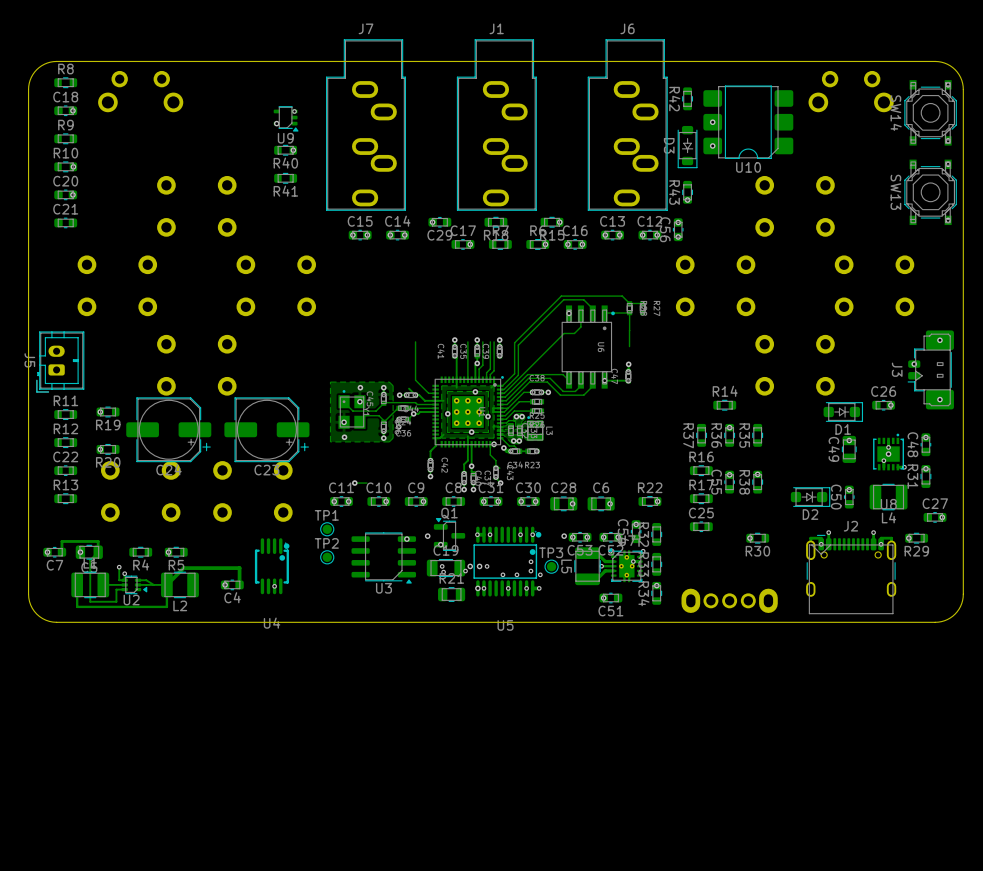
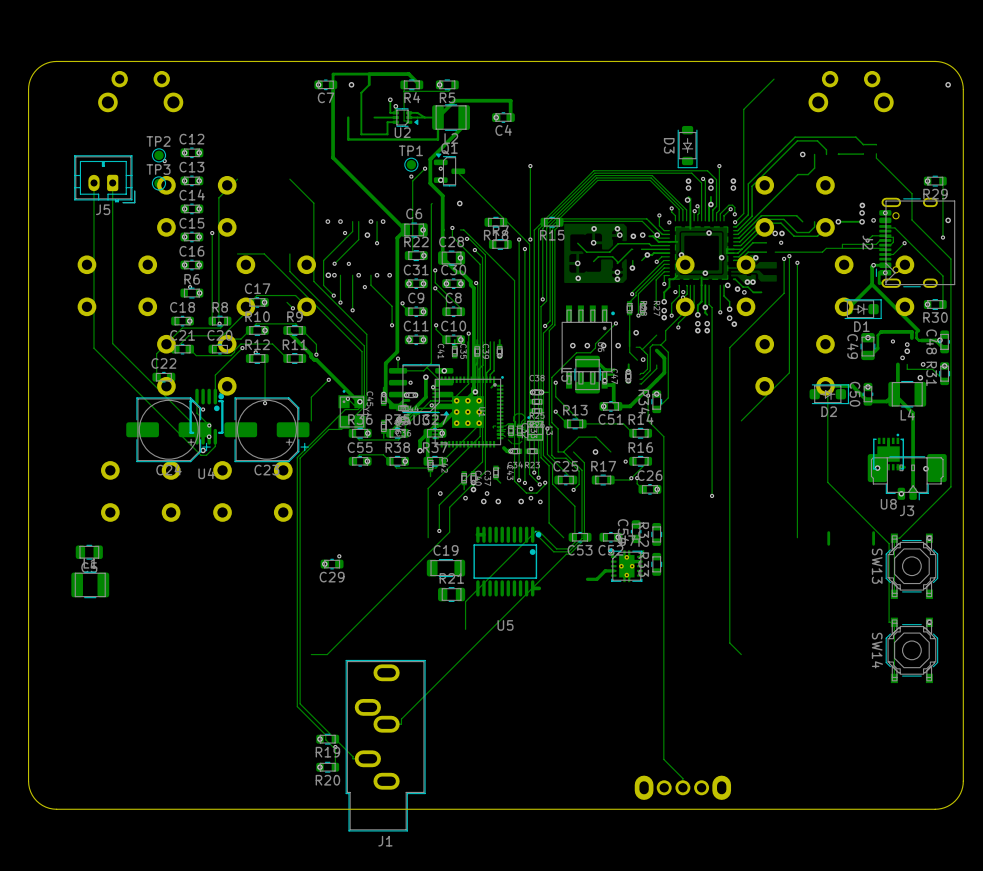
track: none -> (369, 74) (408, 74) (419, 84)
track: none -> (369, 74) (333, 74) (333, 157) (405, 229) (397, 237) (397, 351) (385, 363) (385, 398) (394, 406) (398, 406) (404, 400) (409, 400)
track: none -> (369, 74) (369, 84) (361, 92) (361, 134) (387, 134) (387, 122) (395, 122)
track: none -> (774, 79) (743, 109) (743, 213) (735, 222)
R8 position: (65, 82) -> (219, 321)
via: none -> (318, 84)
via: none -> (351, 84)
track: none -> (404, 84) (404, 120) (409, 122)
via: none -> (439, 84)
track: none -> (455, 84) (448, 91) (404, 91)
R42: (687, 98) -> none
track: none -> (390, 99) (390, 112) (395, 112) (395, 106)
via: none -> (390, 99)
via: none -> (395, 106)
C18 position: (65, 110) -> (182, 321)
via: (72, 110) -> none
via: (294, 111) -> none
SW14 position: (930, 112) -> (911, 650)
track: none -> (395, 117) (374, 117)
track: none -> (437, 117) (409, 117) (409, 112) (417, 112) (424, 117)
track: none -> (437, 117) (437, 139) (348, 139) (348, 117)
track: none -> (464, 117) (464, 125) (430, 159) (430, 183) (442, 195) (442, 257) (457, 272) (461, 272) (470, 281) (473, 288) (473, 387) (472, 393) (440, 425) (435, 425) (420, 440) (420, 450)
via: none -> (496, 117)
track: none -> (510, 117) (510, 100) (454, 100) (437, 117)
U9: (286, 118) -> none
via: (712, 122) -> none
U10: (748, 122) -> none
via: (276, 123) -> none
J7: (366, 125) -> none
J1 rotation: 0° (496, 125) -> 180° (385, 745)
J1 position: (496, 125) -> (385, 745)
J6: (627, 125) -> none
R9 position: (65, 138) -> (294, 330)
via: (948, 140) -> none
track: none -> (863, 144) (876, 144)
track: none -> (863, 144) (855, 137) (795, 137) (748, 183) (748, 214) (736, 226) (733, 226)
via: (712, 145) -> none
R40: (285, 150) -> none
via: (293, 150) -> none
via: none -> (184, 152)
via: none -> (199, 152)
track: none -> (863, 153) (838, 154)
track: none -> (876, 153) (876, 158) (912, 193) (912, 220) (950, 258) (950, 486) (899, 538) (894, 538) (894, 594)
via: none -> (802, 154)
track: none -> (814, 154) (814, 168) (808, 174) (797, 174) (738, 234) (733, 234)
track: none -> (826, 154) (826, 149) (817, 140) (797, 140) (752, 186) (752, 216) (737, 230) (733, 230)
via: none -> (164, 161)
via: (948, 164) -> none
R10 position: (65, 166) -> (257, 330)
via: (73, 166) -> none
track: none -> (530, 166) (530, 239)
via: none -> (530, 166)
track: none -> (719, 166) (719, 210) (716, 213) (716, 220)
via: none -> (719, 166)
track: none -> (425, 168) (412, 181) (412, 251) (408, 255)
via: none -> (425, 168)
via: none -> (440, 168)
track: none -> (458, 171) (529, 244) (529, 474) (539, 484)
via: none -> (411, 176)
R41: (285, 178) -> none
track: none -> (703, 178) (705, 181) (705, 220)
via: none -> (703, 178)
track: none -> (237, 179) (218, 197) (219, 323)
track: none -> (289, 179) (313, 203) (313, 281) (366, 334) (366, 404) (341, 429) (328, 429) (300, 458) (300, 703) (352, 758) (367, 758)
via: none -> (184, 180)
via: none -> (199, 180)
via: none -> (440, 180)
via: none -> (688, 181)
via: none -> (710, 181)
via: none -> (733, 181)
via: none -> (927, 181)
track: none -> (942, 181) (942, 237)
track: none -> (93, 182) (93, 348) (201, 455) (206, 455) (215, 446) (215, 436)
track: none -> (112, 182) (112, 343) (197, 427) (197, 436)
via: none -> (688, 188)
via: none -> (710, 188)
via: none -> (733, 188)
R43: (687, 192) -> none
SW13 position: (930, 192) -> (911, 566)
C20 position: (65, 194) -> (219, 349)
via: (72, 194) -> none
track: none -> (688, 197) (690, 198) (690, 228)
track: none -> (710, 197) (709, 220)
track: none -> (432, 203) (431, 363) (423, 370) (398, 370) (398, 358)
via: none -> (459, 203)
via: none -> (710, 204)
via: none -> (862, 205)
track: none -> (697, 206) (699, 207) (697, 220)
via: none -> (697, 206)
via: none -> (184, 208)
via: none -> (199, 208)
track: none -> (671, 208) (675, 220)
via: none -> (671, 208)
track: none -> (730, 209) (724, 215)
via: none -> (730, 209)
track: none -> (694, 211) (694, 220)
via: none -> (694, 211)
via: none -> (862, 212)
via: none -> (885, 212)
track: none -> (734, 214) (734, 207) (728, 205) (720, 213) (720, 220)
via: none -> (734, 214)
track: none -> (659, 215) (659, 225) (664, 230) (669, 230)
via: none -> (659, 215)
track: none -> (724, 215) (724, 220)
track: none -> (679, 220) (679, 209) (650, 180) (597, 180) (550, 227) (550, 321) (545, 325)
track: none -> (682, 220) (682, 209) (651, 177) (596, 177) (546, 228) (546, 301) (541, 306) (541, 457) (549, 465) (549, 523) (563, 537)
track: none -> (686, 220) (686, 210) (652, 175) (595, 175) (542, 228) (542, 299)
track: none -> (701, 220) (701, 182) (691, 173) (594, 173) (538, 229) (538, 477)
track: none -> (712, 220) (712, 210) (716, 206) (716, 179) (707, 170) (593, 170) (534, 230) (534, 472)
via: none -> (873, 220)
via: none -> (327, 221)
via: none -> (340, 221)
track: none -> (352, 221) (352, 231) (323, 260) (323, 285) (333, 295)
track: none -> (358, 221) (358, 239) (334, 263)
via: none -> (370, 221)
track: none -> (377, 221) (377, 243)
via: none -> (383, 221)
track: none -> (802, 221) (796, 215) (761, 215) (738, 238) (733, 238)
track: none -> (814, 221) (814, 227) (809, 232) (796, 232) (783, 219) (762, 219) (739, 241) (733, 241)
track: none -> (826, 221) (826, 227) (817, 236) (794, 236) (781, 223) (763, 223) (740, 245) (733, 245)
track: none -> (838, 221) (862, 221)
via: none -> (838, 221)
via: none -> (862, 221)
C21 position: (65, 222) -> (182, 349)
via: (432, 222) -> none
C29 position: (439, 222) -> (332, 564)
via: (559, 222) -> none
via: none -> (669, 222)
via: (678, 222) -> none
via: none -> (735, 222)
zone outline: none -> (727, 226) (675, 226) (675, 279) (727, 279) (727, 226)
track: none -> (885, 226) (894, 227) (942, 276) (942, 304)
track: none -> (452, 227) (452, 236) (480, 264) (480, 436) (428, 488) (428, 537)
via: none -> (452, 227)
via: none -> (594, 228)
via: none -> (617, 228)
via: none -> (423, 229)
track: none -> (460, 229) (463, 229) (514, 280) (514, 481) (526, 493) (536, 493) (545, 482)
C56: (678, 229) -> none
via: none -> (709, 232)
track: none -> (212, 233) (212, 321)
via: none -> (212, 233)
via: none -> (345, 233)
track: none -> (766, 233) (757, 233) (738, 253) (726, 253) (726, 249) (733, 249) (741, 249)
via: none -> (775, 233)
via: none -> (781, 233)
track: none -> (669, 234) (662, 234) (646, 218) (562, 218) (552, 228) (552, 324) (543, 333) (543, 455) (552, 464) (552, 483) (574, 506) (574, 542) (568, 548) (556, 548) (539, 531) (535, 531) (465, 601) (465, 629)
via: (352, 235) -> none
C15 position: (360, 235) -> (191, 236)
via: (390, 235) -> none
C14 position: (397, 235) -> (191, 208)
via: (404, 235) -> none
via: (605, 235) -> none
C13 position: (612, 235) -> (191, 180)
C12 position: (649, 235) -> (191, 152)
via: none -> (184, 236)
via: none -> (199, 236)
via: none -> (633, 236)
track: none -> (649, 236) (652, 236) (658, 241) (677, 241)
via: (678, 236) -> none
via: none -> (942, 237)
track: none -> (466, 238) (469, 238) (485, 254) (485, 471) (449, 507) (449, 532) (327, 654) (311, 654)
via: none -> (466, 238)
track: none -> (669, 238) (659, 238) (642, 221) (563, 221) (554, 229) (554, 325) (549, 330) (549, 424) (551, 427) (551, 455) (554, 458) (566, 458) (579, 471) (579, 484) (573, 489)
track: none -> (519, 239) (519, 480)
via: none -> (519, 239)
via: none -> (530, 239)
track: none -> (867, 240) (872, 235) (893, 237) (893, 242) (890, 245) (885, 245)
via: none -> (867, 240)
track: none -> (885, 240) (880, 240) (876, 244) (842, 244) (842, 248)
via: none -> (593, 242)
track: none -> (766, 242) (753, 242) (738, 256) (733, 256)
via: none -> (781, 242)
via: none -> (377, 243)
track: none -> (577, 243) (586, 252) (609, 252) (618, 243) (669, 245)
track: none -> (904, 243) (893, 254) (885, 254)
via: none -> (904, 243)
C17 position: (462, 244) -> (257, 302)
via position: (470, 244) -> (460, 257)
R6 position: (537, 244) -> (191, 293)
via: (545, 244) -> none
via: (567, 244) -> none
C16 position: (575, 244) -> (191, 265)
via: (582, 244) -> none
track: none -> (524, 249) (524, 482)
via: none -> (524, 249)
track: none -> (632, 249) (617, 263) (612, 256) (598, 256) (593, 261)
track: none -> (669, 249) (641, 249)
track: none -> (885, 249) (826, 248) (822, 252) (775, 252)
track: none -> (474, 250) (482, 257) (482, 461) (439, 505) (439, 530)
via: none -> (474, 250)
track: none -> (766, 252) (748, 252) (739, 260) (733, 260)
track: none -> (237, 253) (264, 253) (362, 351) (362, 402) (359, 405) (354, 405) (347, 398)
track: none -> (289, 253) (289, 271) (364, 346) (364, 403) (358, 409) (345, 409) (297, 457) (297, 706) (325, 735) (325, 739) (335, 747) (335, 767)
track: none -> (669, 253) (653, 253) (647, 254) (641, 260)
via: none -> (647, 254)
via: none -> (681, 254)
via: none -> (423, 255)
track: none -> (669, 256) (661, 256) (656, 261)
track: none -> (789, 256) (789, 372) (741, 420)
via: none -> (789, 256)
via: none -> (721, 257)
via: none -> (755, 257)
track: none -> (784, 258) (784, 293) (729, 347) (729, 643) (741, 654)
via: none -> (784, 258)
track: none -> (632, 260) (632, 268)
track: none -> (669, 260) (663, 260) (632, 294)
via: none -> (656, 261)
track: none -> (797, 262) (797, 537)
via: none -> (797, 262)
via: none -> (334, 263)
via: none -> (348, 263)
via: none -> (577, 263)
track: none -> (669, 264) (664, 264) (636, 292) (636, 295) (629, 302) (629, 352) (637, 360)
via: none -> (184, 265)
via: none -> (199, 265)
via: none -> (873, 265)
track: none -> (885, 265) (872, 266) (872, 284)
via: none -> (632, 268)
track: none -> (669, 268) (664, 268) (638, 293) (638, 315)
track: none -> (435, 270) (435, 282) (460, 308) (460, 311)
via: none -> (435, 270)
track: none -> (669, 271) (664, 271) (656, 279) (656, 306)
via: none -> (617, 272)
track: none -> (885, 272) (879, 272) (879, 283) (891, 283)
via: none -> (885, 272)
via: none -> (705, 273)
via: none -> (328, 275)
via: none -> (334, 275)
track: none -> (340, 275) (340, 302)
track: none -> (352, 275) (352, 310)
via: none -> (358, 275)
track: none -> (370, 275) (370, 285) (392, 306) (392, 325)
via: none -> (377, 275)
via: none -> (389, 275)
track: none -> (669, 275) (664, 275) (664, 284)
track: none -> (677, 275) (673, 279) (669, 279) (669, 287) (664, 292) (664, 301)
track: none -> (701, 277) (701, 301) (697, 305) (697, 314)
via: none -> (578, 278)
via: none -> (617, 279)
track: none -> (733, 279) (753, 292) (761, 292)
via: none -> (747, 282)
via: none -> (753, 282)
via: none -> (409, 283)
via: none -> (423, 283)
via: none -> (446, 283)
via: none -> (460, 283)
track: none -> (476, 283) (477, 284) (477, 426) (435, 468) (396, 468) (383, 454) (359, 454) (352, 461)
via: none -> (476, 283)
via: none -> (664, 284)
track: none -> (872, 284) (847, 309)
track: none -> (872, 284) (918, 330) (916, 338) (918, 340) (935, 340) (944, 349)
track: none -> (679, 285) (679, 295) (671, 303) (671, 315)
track: none -> (686, 285) (687, 293) (683, 297)
track: none -> (690, 285) (690, 306) (665, 330) (665, 340) (660, 344)
track: none -> (694, 285) (694, 307) (678, 323) (678, 327)
track: none -> (705, 285) (705, 312) (707, 314)
track: none -> (709, 285) (709, 304) (712, 307) (712, 495)
track: none -> (720, 285) (720, 312)
track: none -> (724, 285) (724, 296) (729, 301) (729, 309)
via: none -> (727, 285)
via: none -> (190, 287)
via: none -> (364, 287)
track: none -> (435, 288) (446, 299) (446, 311)
via: none -> (435, 288)
via: none -> (737, 289)
via: none -> (675, 292)
via: none -> (683, 292)
via: none -> (744, 292)
via: none -> (199, 293)
via: none -> (632, 294)
via: none -> (333, 295)
via: none -> (683, 297)
via: none -> (542, 299)
via: none -> (664, 301)
via: none -> (264, 302)
track: none -> (287, 302) (292, 308)
track: none -> (302, 302) (295, 295) (256, 295) (250, 302) (250, 308) (222, 335) (188, 335) (175, 349)
via: none -> (340, 302)
track: none -> (402, 303) (409, 311)
via: none -> (402, 303)
track: (642, 303) (629, 303) (622, 296) (561, 296) (514, 342) (514, 373) (502, 385) (500, 385) -> none
via: none -> (927, 304)
via: none -> (705, 307)
via: none -> (292, 308)
track: (604, 308) (604, 313) (629, 313) (629, 330) -> none
via: none -> (729, 309)
via: none -> (352, 310)
via: none -> (664, 310)
via: none -> (423, 311)
via: none -> (720, 312)
via: (569, 313) -> none
track: (580, 313) (580, 327) (574, 333) (564, 333) (504, 393) (500, 393) -> none
track: (592, 313) (592, 308) (583, 299) (563, 299) (518, 345) (518, 375) (504, 389) (500, 389) -> none
via: none -> (697, 314)
via: none -> (638, 315)
via: none -> (671, 315)
via: none -> (664, 317)
via: none -> (729, 318)
via: none -> (189, 321)
track: none -> (227, 321) (220, 328) (182, 328) (156, 353) (156, 377)
via: none -> (219, 323)
track: none -> (615, 323) (595, 343) (595, 347) (590, 352) (576, 352) (551, 377) (551, 422) (558, 428) (558, 451) (563, 451)
via: none -> (615, 323)
via: none -> (697, 323)
via: none -> (707, 323)
via: none -> (734, 324)
via: none -> (392, 325)
track: none -> (436, 325) (436, 329) (446, 339)
via: none -> (436, 325)
via: none -> (545, 325)
via: none -> (678, 327)
via: none -> (265, 330)
track: none -> (287, 330) (357, 400)
via: none -> (697, 330)
via: none -> (707, 330)
via: none -> (636, 332)
track: none -> (468, 333) (468, 383) (451, 400) (430, 400) (405, 426) (405, 433) (398, 439) (359, 439) (352, 433)
via: none -> (468, 333)
track: none -> (656, 335) (642, 349)
via: none -> (867, 337)
track: none -> (911, 338) (911, 331) (881, 331) (877, 335) (877, 348) (870, 355) (867, 355)
via: none -> (409, 339)
via: none -> (423, 339)
via: none -> (460, 339)
via: (454, 340) -> none
via: (477, 340) -> none
via: (499, 340) -> none
track: (415, 341) (415, 380) (428, 393) (435, 393) -> none
via: none -> (892, 341)
track: none -> (660, 344) (668, 352) (668, 397) (656, 409)
track: none -> (660, 344) (652, 344) (650, 347) (650, 370) (639, 379)
via: none -> (907, 344)
via: none -> (572, 345)
via: none -> (587, 345)
via: none -> (603, 345)
via: none -> (618, 345)
via: (454, 346) -> none
via: (477, 346) -> none
via: (499, 346) -> none
track: none -> (636, 347) (640, 347) (647, 354) (647, 369) (639, 374)
track: none -> (242, 348) (215, 375) (215, 396)
via: none -> (242, 348)
track: none -> (189, 349) (196, 355) (231, 355) (240, 344) (272, 344) (287, 358)
track: none -> (212, 349) (222, 339) (241, 339) (256, 323) (295, 323) (316, 344) (316, 354)
track: none -> (656, 350) (664, 358) (664, 372) (630, 406) (618, 406) (613, 401) (613, 383) (607, 385)
via: none -> (907, 351)
via: none -> (255, 352)
via: none -> (316, 354)
track: (454, 355) (456, 357) (456, 387) -> none
via: (454, 355) -> none
via: none -> (902, 357)
track: none -> (265, 358) (265, 403)
via: none -> (398, 358)
via: none -> (643, 359)
J5 rotation: 0° (60, 361) -> 90° counterclockwise (104, 179)
J5 position: (60, 361) -> (104, 179)
via: (477, 363) -> none
via: (628, 364) -> none
track: none -> (897, 364) (897, 390) (886, 401) (867, 401) (852, 386) (822, 386) (814, 394)
track: none -> (907, 364) (907, 369) (932, 369) (944, 381)
via: (914, 364) -> none
via: none -> (923, 364)
track: none -> (656, 365) (656, 368) (639, 383)
via: none -> (944, 365)
track: none -> (426, 367) (444, 382)
J3 rotation: 0° (930, 369) -> 90° counterclockwise (907, 477)
J3 position: (930, 369) -> (907, 477)
via: none -> (444, 370)
track: none -> (425, 377) (425, 397) (389, 433)
via: none -> (425, 377)
via: none -> (920, 377)
track: none -> (328, 379) (311, 397) (311, 420)
via: none -> (328, 379)
track: (569, 380) (562, 374) (527, 374) (505, 397) (500, 397) -> none
track: (580, 380) (580, 385) (575, 391) (563, 391) (550, 378) (528, 378) (506, 400) (500, 400) -> none
track: (592, 380) (592, 386) (583, 395) (560, 395) (547, 382) (529, 382) (507, 404) (500, 404) -> none
track: (604, 380) (628, 380) -> none
zone outline: (389, 382) (330, 382) (330, 441) (389, 441) (393, 438) (393, 385) (389, 382) -> none
via: none -> (410, 382)
track: none -> (555, 382) (555, 396) (582, 423) (623, 423) (632, 433)
via: none -> (555, 382)
zone outline: (494, 385) (441, 385) (441, 438) (494, 438) (494, 385) -> none
via: none -> (867, 386)
via: (360, 387) -> none
via: (383, 387) -> none
via: none -> (433, 387)
track: (409, 388) (424, 400) (443, 400) -> none
zone outline: (488, 391) (447, 391) (447, 432) (488, 432) (488, 391) -> none
track: (532, 392) (523, 392) (504, 412) (493, 412) (493, 408) (500, 408) (508, 408) -> none
via: (548, 392) -> none
track: none -> (827, 393) (827, 482) (889, 543) (889, 622) (894, 622) (894, 678)
via: none -> (656, 394)
track: none -> (894, 394) (913, 413) (913, 493)
via: (399, 395) -> none
track: none -> (648, 395) (648, 420) (663, 436) (663, 759) (682, 778) (682, 787)
via: none -> (648, 395)
track: none -> (197, 396) (197, 413) (209, 425)
via: none -> (347, 398)
track: (344, 399) (352, 411) (376, 411) (384, 402) (435, 404) -> none
via: (939, 399) -> none
track: (532, 401) (519, 401) (505, 415) (500, 415) -> none
via: none -> (265, 403)
via: none -> (431, 405)
R14 position: (724, 405) -> (640, 433)
C26 position: (883, 405) -> (649, 489)
via: (890, 405) -> none
via: none -> (603, 406)
track: (399, 408) (383, 422) (378, 415) (364, 415) (359, 420) -> none
via: none -> (203, 409)
track: (532, 411) (514, 411) (506, 419) (500, 419) -> none
track: none -> (555, 411) (567, 423)
via: none -> (555, 411)
via: (100, 412) -> none
R19 position: (108, 412) -> (327, 739)
D1 position: (843, 412) -> (861, 309)
via: (413, 413) -> none
via: (447, 413) -> none
R11 position: (65, 414) -> (294, 358)
via: (487, 416) -> none
via: (516, 416) -> none
via: (522, 416) -> none
track: (515, 420) (500, 423) -> none
via: (344, 422) -> none
via: none -> (209, 425)
via: (398, 426) -> none
via: (729, 427) -> none
track: none -> (547, 428) (547, 454) (573, 480)
via: none -> (547, 428)
via: (383, 431) -> none
via: (471, 432) -> none
via: none -> (367, 433)
track: none -> (427, 433) (427, 461)
via: none -> (442, 433)
track: (443, 434) (439, 438) (435, 438) (435, 446) (430, 451) (430, 460) -> none
R37 rotation: 0° (701, 435) -> 90° clockwise (434, 461)
R37 position: (701, 435) -> (434, 461)
R36 rotation: 0° (729, 435) -> 90° clockwise (360, 433)
R36 position: (729, 435) -> (360, 433)
R35 rotation: 0° (757, 435) -> 90° clockwise (397, 433)
R35 position: (757, 435) -> (397, 433)
via: none -> (209, 436)
track: (467, 436) (467, 460) (464, 464) (464, 473) -> none
via: (344, 437) -> none
via: (925, 437) -> none
via: (383, 438) -> none
track: (500, 438) (519, 451) (527, 451) -> none
via: (513, 440) -> none
via: (519, 440) -> none
via: (849, 440) -> none
R12 position: (65, 442) -> (257, 358)
track: (471, 444) (471, 471) (473, 473) -> none
track: (490, 444) (490, 455) (495, 460) (495, 468) -> none
via: (494, 444) -> none
C48 position: (925, 444) -> (944, 341)
via: (503, 447) -> none
via: (888, 447) -> none
via: (100, 449) -> none
R20 position: (108, 449) -> (327, 767)
C49 position: (849, 449) -> (867, 346)
via: none -> (203, 450)
via: none -> (420, 450)
via: (536, 451) -> none
track: none -> (563, 451) (582, 470) (582, 538) (568, 551) (553, 551) (537, 535)
track: none -> (573, 451) (584, 462) (584, 539) (569, 554) (566, 554) (401, 719) (401, 724) (386, 724)
via: none -> (595, 451)
track: none -> (610, 451) (596, 437) (578, 437) (563, 451)
via: (888, 454) -> none
via: (430, 460) -> none
via: (883, 460) -> none
via: none -> (367, 461)
via: none -> (405, 461)
via: none -> (625, 461)
track: none -> (648, 461) (629, 480) (610, 480)
via: (471, 466) -> none
via: (904, 467) -> none
via: (495, 468) -> none
via: none -> (877, 468)
via: (430, 469) -> none
C22 position: (65, 470) -> (163, 377)
R16 position: (701, 470) -> (640, 461)
via: none -> (534, 472)
via: (464, 473) -> none
via: (729, 474) -> none
via: (757, 474) -> none
via: (430, 476) -> none
R31 position: (925, 476) -> (944, 373)
via: (495, 477) -> none
via: none -> (538, 477)
via: none -> (631, 478)
track: none -> (637, 478) (637, 483) (642, 489)
via: none -> (637, 478)
via: none -> (519, 480)
via: (464, 482) -> none
via: none -> (524, 482)
via: none -> (545, 482)
C55 rotation: 0° (729, 482) -> 90° clockwise (360, 461)
C55 position: (729, 482) -> (360, 461)
R38 rotation: 0° (757, 482) -> 90° clockwise (397, 461)
R38 position: (757, 482) -> (397, 461)
via: (354, 483) -> none
track: (366, 483) (354, 483) -> none
via: (500, 483) -> none
via: none -> (539, 484)
via: none -> (531, 488)
via: (464, 489) -> none
via: none -> (573, 489)
via: (849, 489) -> none
via: none -> (440, 493)
via: none -> (487, 493)
via: none -> (901, 493)
via: none -> (712, 495)
D2 position: (810, 497) -> (829, 394)
C50 position: (849, 497) -> (867, 394)
L4 position: (888, 497) -> (907, 394)
R13 position: (65, 498) -> (575, 423)
via: none -> (465, 498)
via: none -> (530, 498)
R17 position: (701, 498) -> (603, 480)
via: (334, 501) -> none
C11 position: (341, 501) -> (416, 339)
via: (348, 501) -> none
C10 position: (378, 501) -> (453, 339)
via: (386, 501) -> none
C9 position: (416, 501) -> (416, 311)
via: (423, 501) -> none
C8 position: (453, 501) -> (453, 311)
C31 position: (491, 501) -> (416, 283)
C30 position: (528, 501) -> (453, 283)
via: (535, 501) -> none
via: none -> (540, 501)
R22 position: (649, 501) -> (416, 255)
via position: (657, 501) -> (657, 489)
C28 position: (563, 503) -> (451, 257)
via: (572, 503) -> none
C6 position: (601, 503) -> (414, 229)
via: (610, 503) -> none
C27 position: (935, 517) -> (434, 433)
via: (942, 517) -> none
via: (636, 524) -> none
C25 position: (701, 526) -> (565, 480)
TP1 position: (327, 529) -> (411, 164)
via: none -> (439, 530)
via: (828, 532) -> none
via: (873, 532) -> none
Q1 position: (449, 534) -> (449, 169)
via: (477, 534) -> none
via: (490, 534) -> none
via: (520, 534) -> none
via: (532, 534) -> none
via: (427, 536) -> none
via: (564, 536) -> none
via: (572, 537) -> none
via: (587, 537) -> none
via: (603, 537) -> none
via: (749, 538) -> none
R30 position: (757, 538) -> (935, 304)
via: (908, 538) -> none
R29 position: (916, 538) -> (935, 181)
via: none -> (929, 538)
via: (406, 539) -> none
via: (440, 544) -> none
track: (821, 544) (821, 538) (810, 538) (810, 550) -> none
via: (821, 544) -> none
track: (881, 544) (881, 538) (891, 538) (891, 550) -> none
via: (881, 544) -> none
via: (643, 551) -> none
via: (47, 552) -> none
C7 position: (54, 552) -> (325, 84)
track: (61, 552) (61, 541) (98, 541) (98, 552) (90, 560) (90, 601) (116, 601) (116, 589) (124, 589) -> none
via: (80, 552) -> none
R4 position: (140, 552) -> (411, 84)
via: (168, 552) -> none
R5 position: (176, 552) -> (447, 84)
track: (587, 553) (596, 553) (605, 561) (613, 561) -> (587, 361) (596, 361) (605, 369) (613, 369)
via: none -> (339, 556)
TP2 position: (327, 557) -> (158, 155)
U3 position: (383, 557) -> (421, 389)
via: (531, 561) -> none
via: (633, 561) -> none
via: none -> (324, 564)
U4 position: (272, 566) -> (206, 416)
via: (442, 566) -> none
via: (470, 566) -> none
via: (479, 566) -> none
via: (487, 566) -> none
TP3 position: (551, 566) -> (158, 183)
L5 position: (587, 566) -> (587, 374)
via: (601, 566) -> none
track: (613, 566) (601, 566) -> (613, 374) (601, 374)
track: (119, 567) (119, 580) (124, 580) (124, 573) -> none
via: (119, 567) -> none
via: (465, 571) -> none
via: (530, 571) -> none
via: (443, 572) -> none
via: (124, 573) -> none
via: (502, 574) -> none
via: (516, 574) -> none
via: (540, 574) -> none
J2 rotation: 0° (851, 574) -> 90° counterclockwise (915, 242)
J2 position: (851, 574) -> (915, 242)
track: (138, 580) (146, 580) (153, 584) -> none
track: (124, 584) (103, 584) -> none
U2 position: (134, 584) -> (405, 117)
track: (166, 584) (138, 584) -> none
track: (166, 584) (166, 606) (77, 606) (77, 584) -> none
L2 position: (179, 584) -> (451, 117)
via: (225, 584) -> none
C4 position: (232, 584) -> (503, 117)
track: (239, 584) (239, 568) (183, 568) (166, 584) -> none
via: (656, 585) -> none
via: (274, 586) -> none
via: (477, 588) -> none
via: (483, 588) -> none
via: (508, 588) -> none
via: (526, 588) -> none
via: (539, 588) -> none
R34 position: (656, 593) -> (656, 401)
board edge: (963, 594) (960, 606) (955, 614) (947, 619) (935, 622) (56, 622) (45, 620) (36, 614) (30, 605) (28, 594) -> (963, 594) (963, 784) (959, 796) (952, 803) (944, 807) (935, 809) (49, 808) (36, 801) (28, 784) (28, 594)
via: (603, 598) -> none
C51 position: (610, 598) -> (610, 406)
part position: (729, 600) -> (682, 787)
via: none -> (929, 622)
via: none -> (319, 739)
via: none -> (335, 747)
via: none -> (319, 767)

